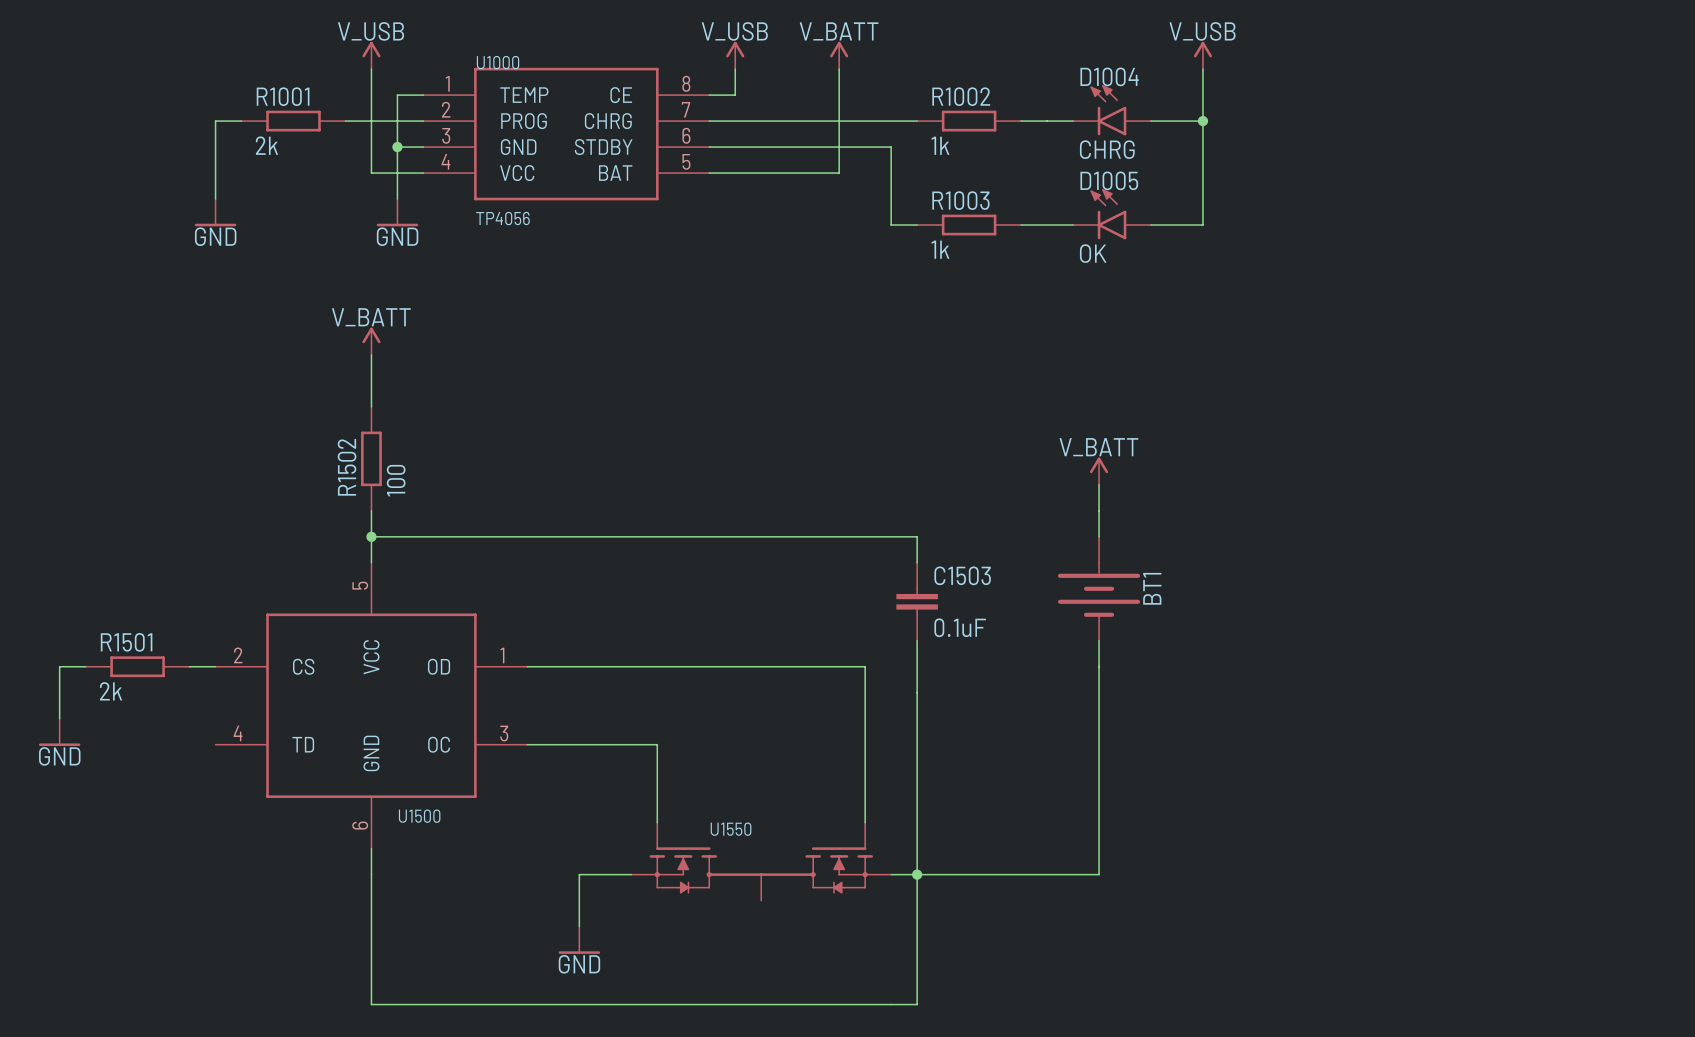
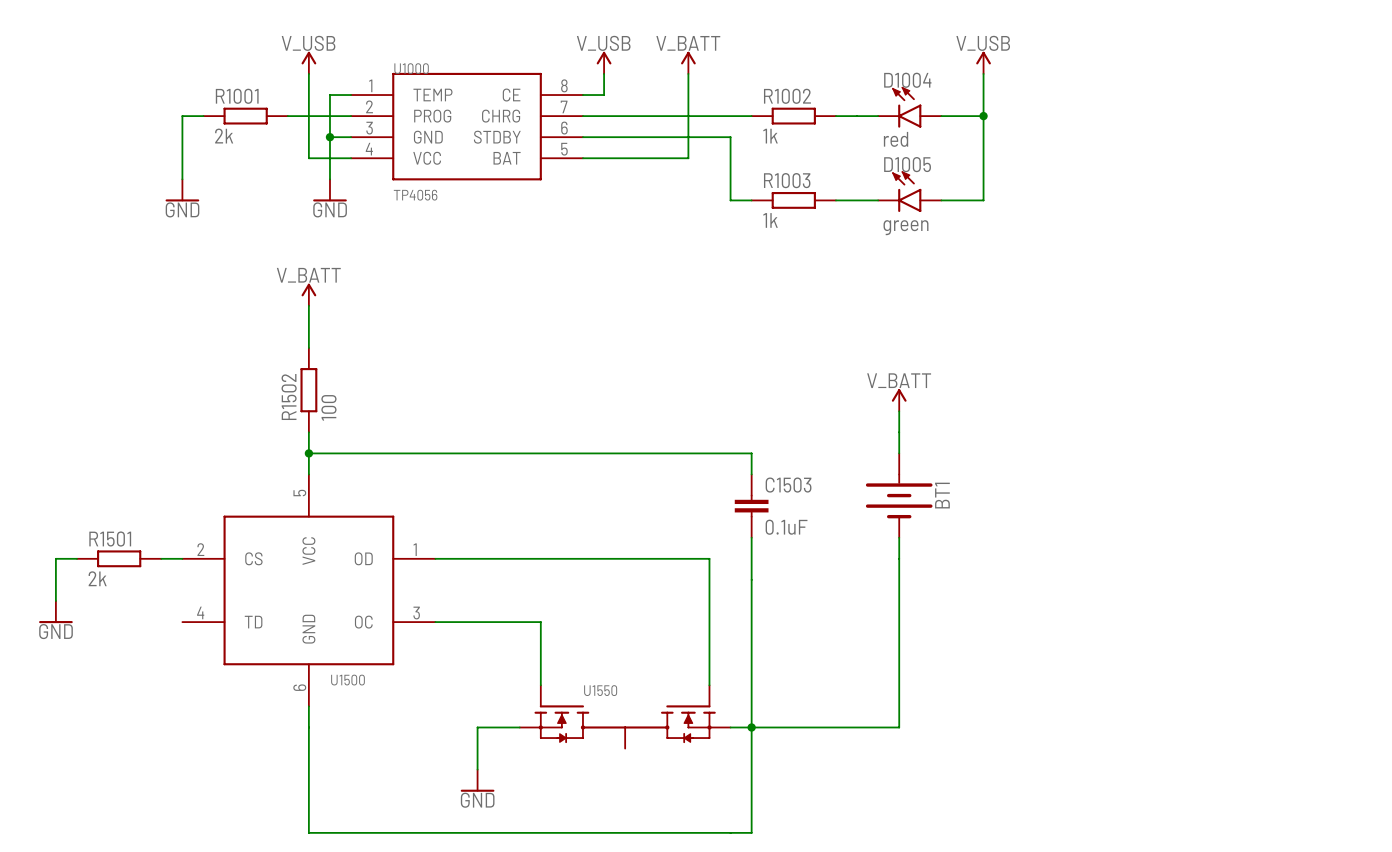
D1004 value: CHRG (1107, 149) -> red (896, 139)
D1005 value: OK (1093, 253) -> green (905, 227)

